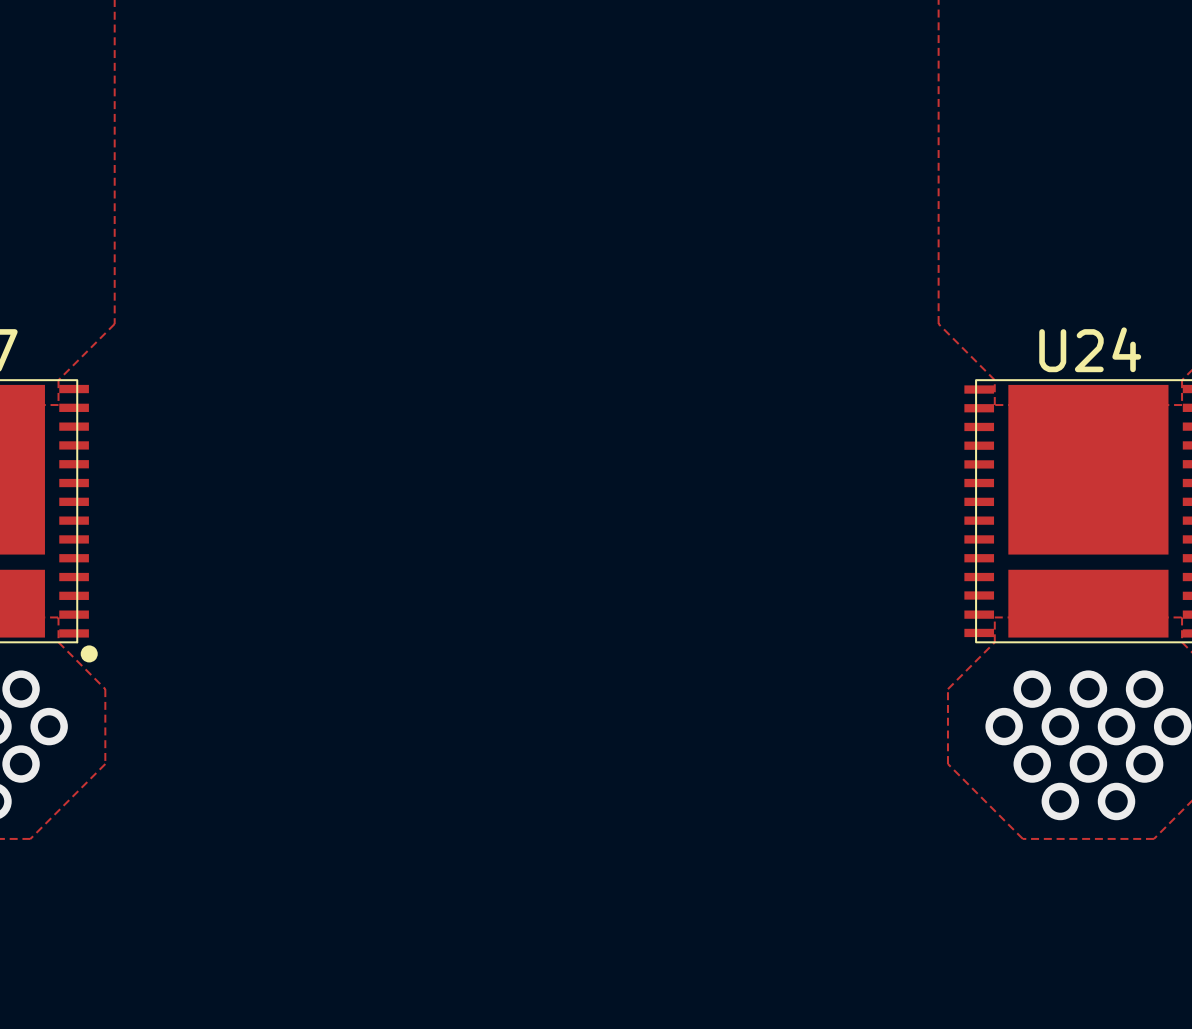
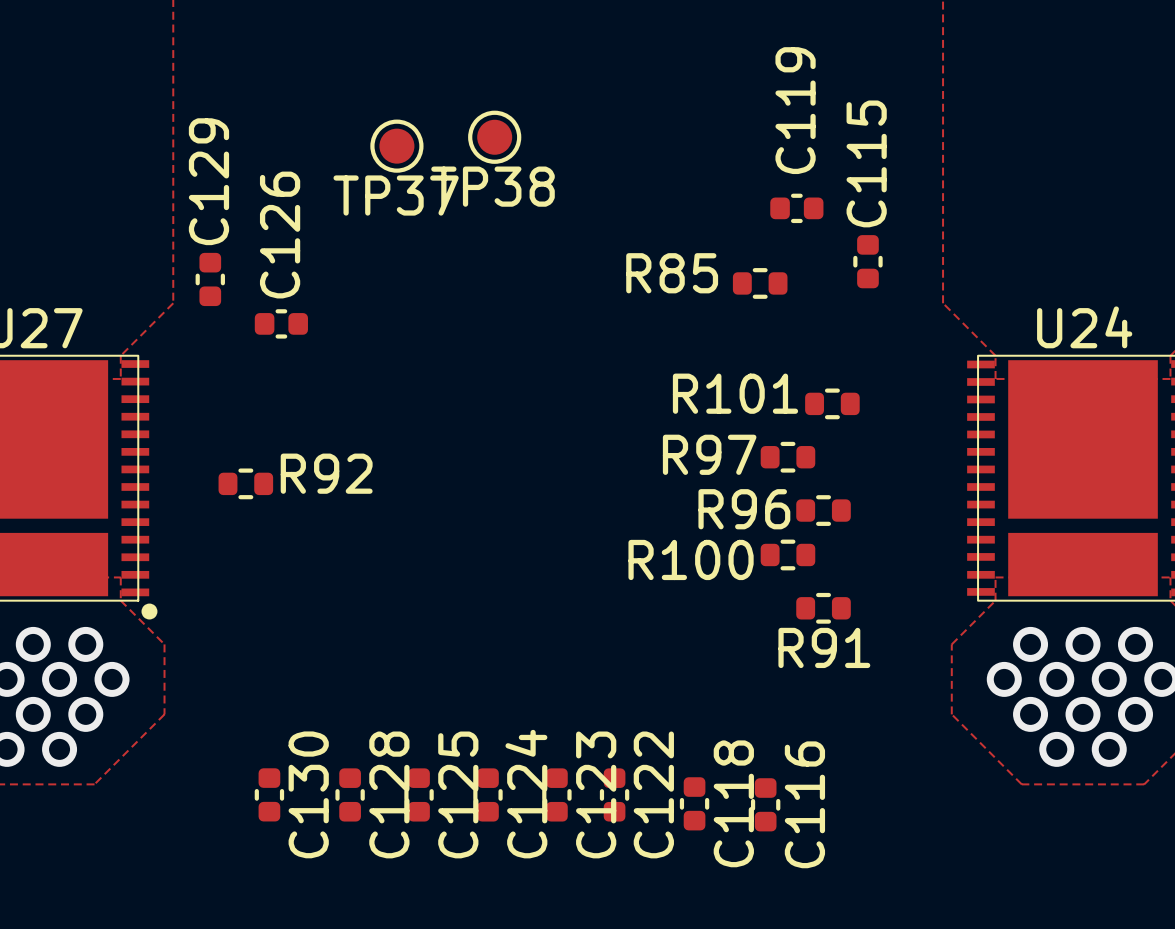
TP38: none -> (494, 137)
TP37: none -> (396, 146)
C119: none -> (796, 208)
C115: none -> (867, 261)
C129: none -> (210, 279)
R85: none -> (760, 283)
C126: none -> (281, 323)
R101: none -> (832, 403)
R97: none -> (787, 457)
R92: none -> (245, 483)
R96: none -> (823, 510)
R100: none -> (787, 554)
R91: none -> (823, 608)
C130: none -> (269, 794)
C128: none -> (350, 794)
C125: none -> (419, 794)
C124: none -> (487, 794)
C123: none -> (556, 794)
C122: none -> (614, 794)
C118: none -> (694, 803)
C116: none -> (765, 804)

